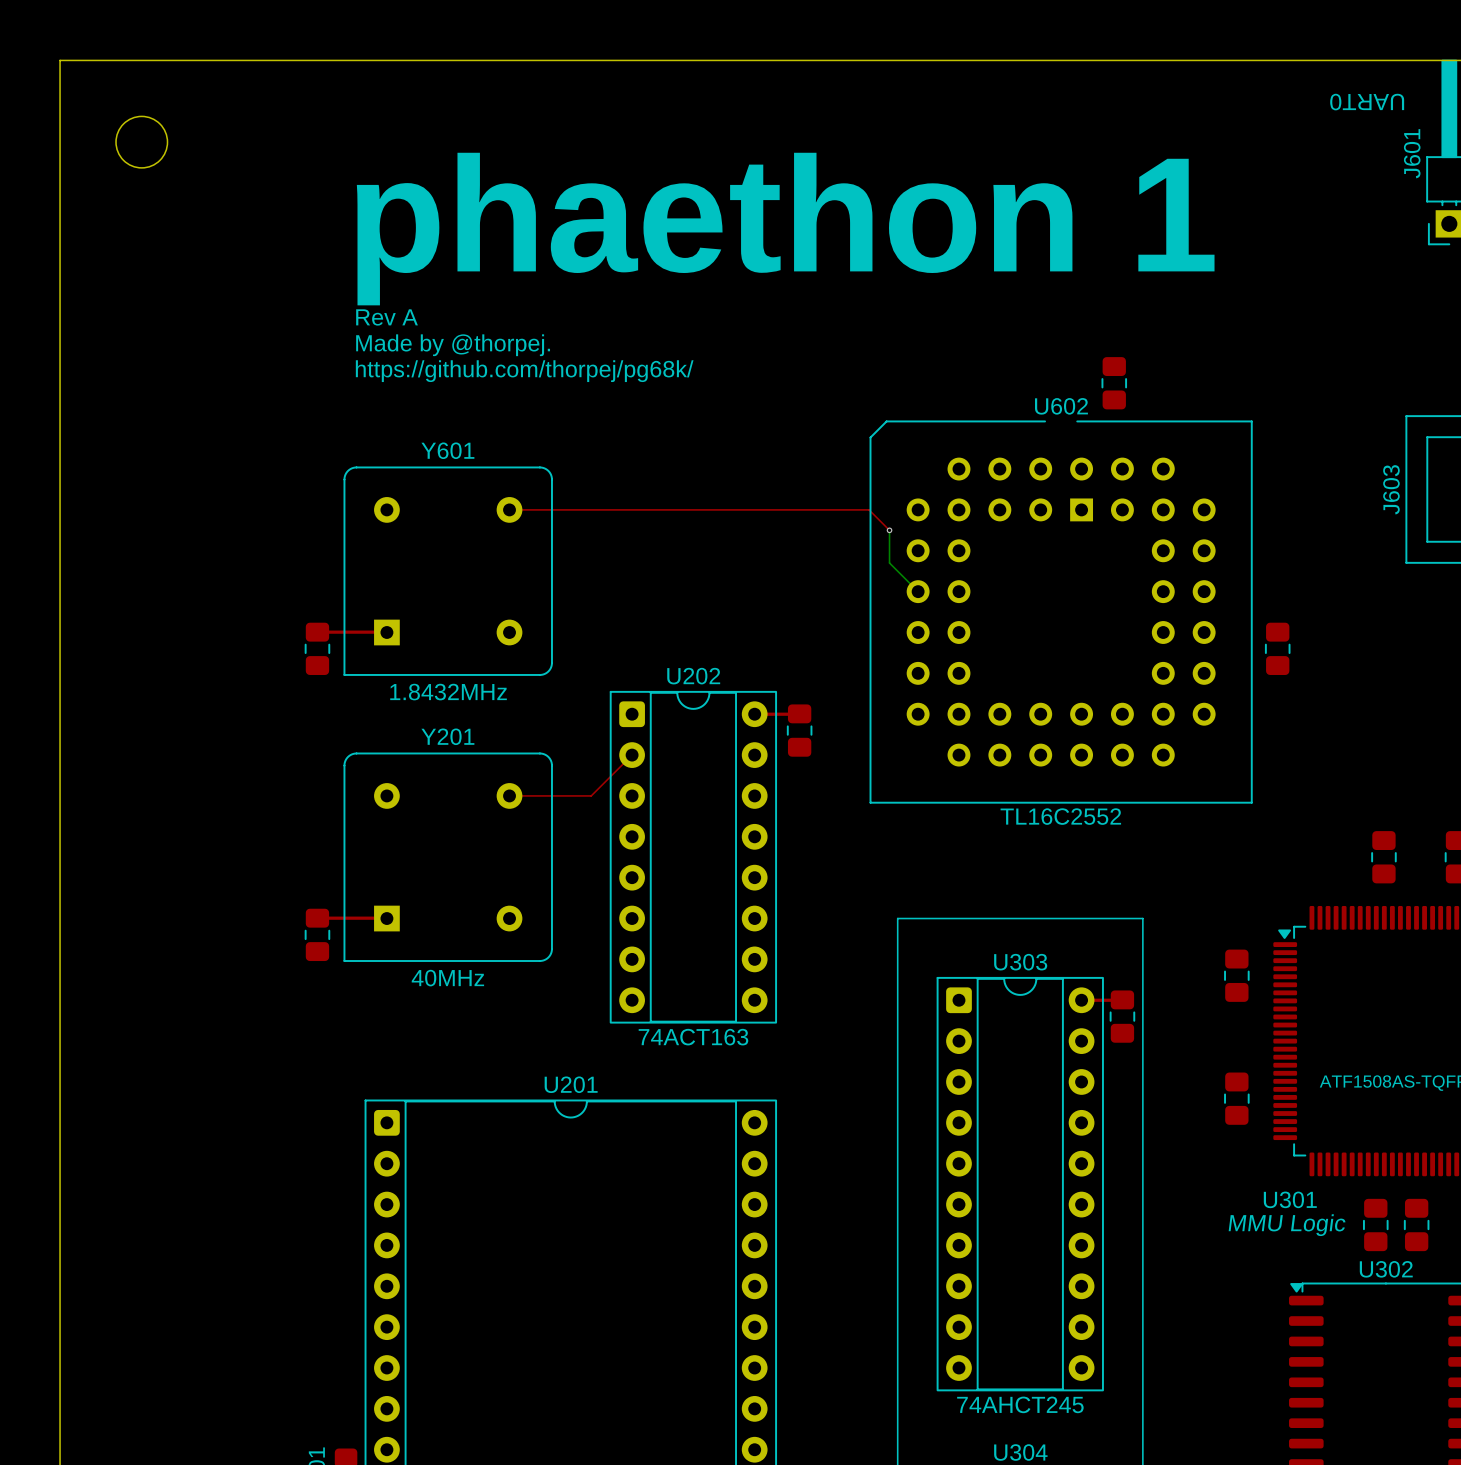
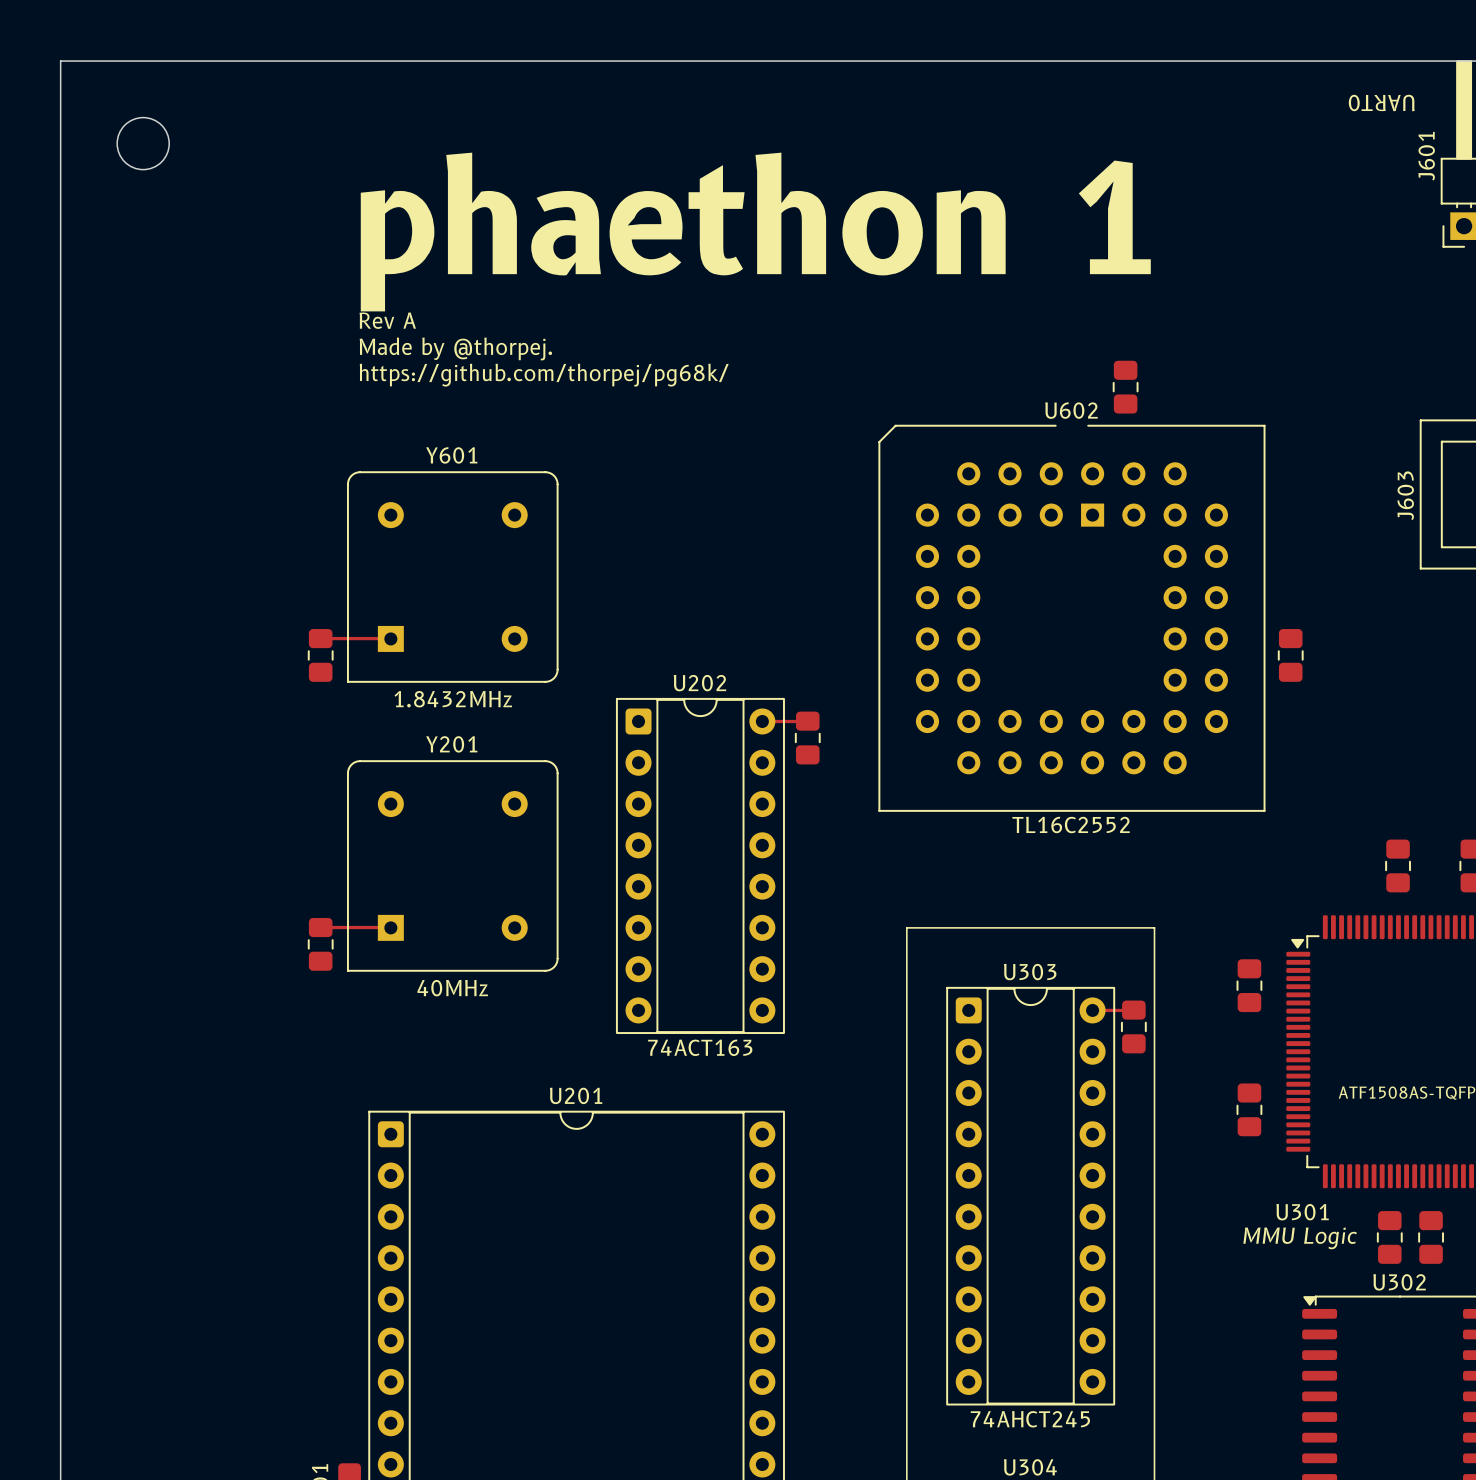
top track: (509, 509) (869, 509) (889, 530) -> none
bottom track: (889, 530) (889, 563) (918, 591) -> none
via: (889, 530) -> none
top track: (632, 755) (591, 795) (509, 795) -> none

